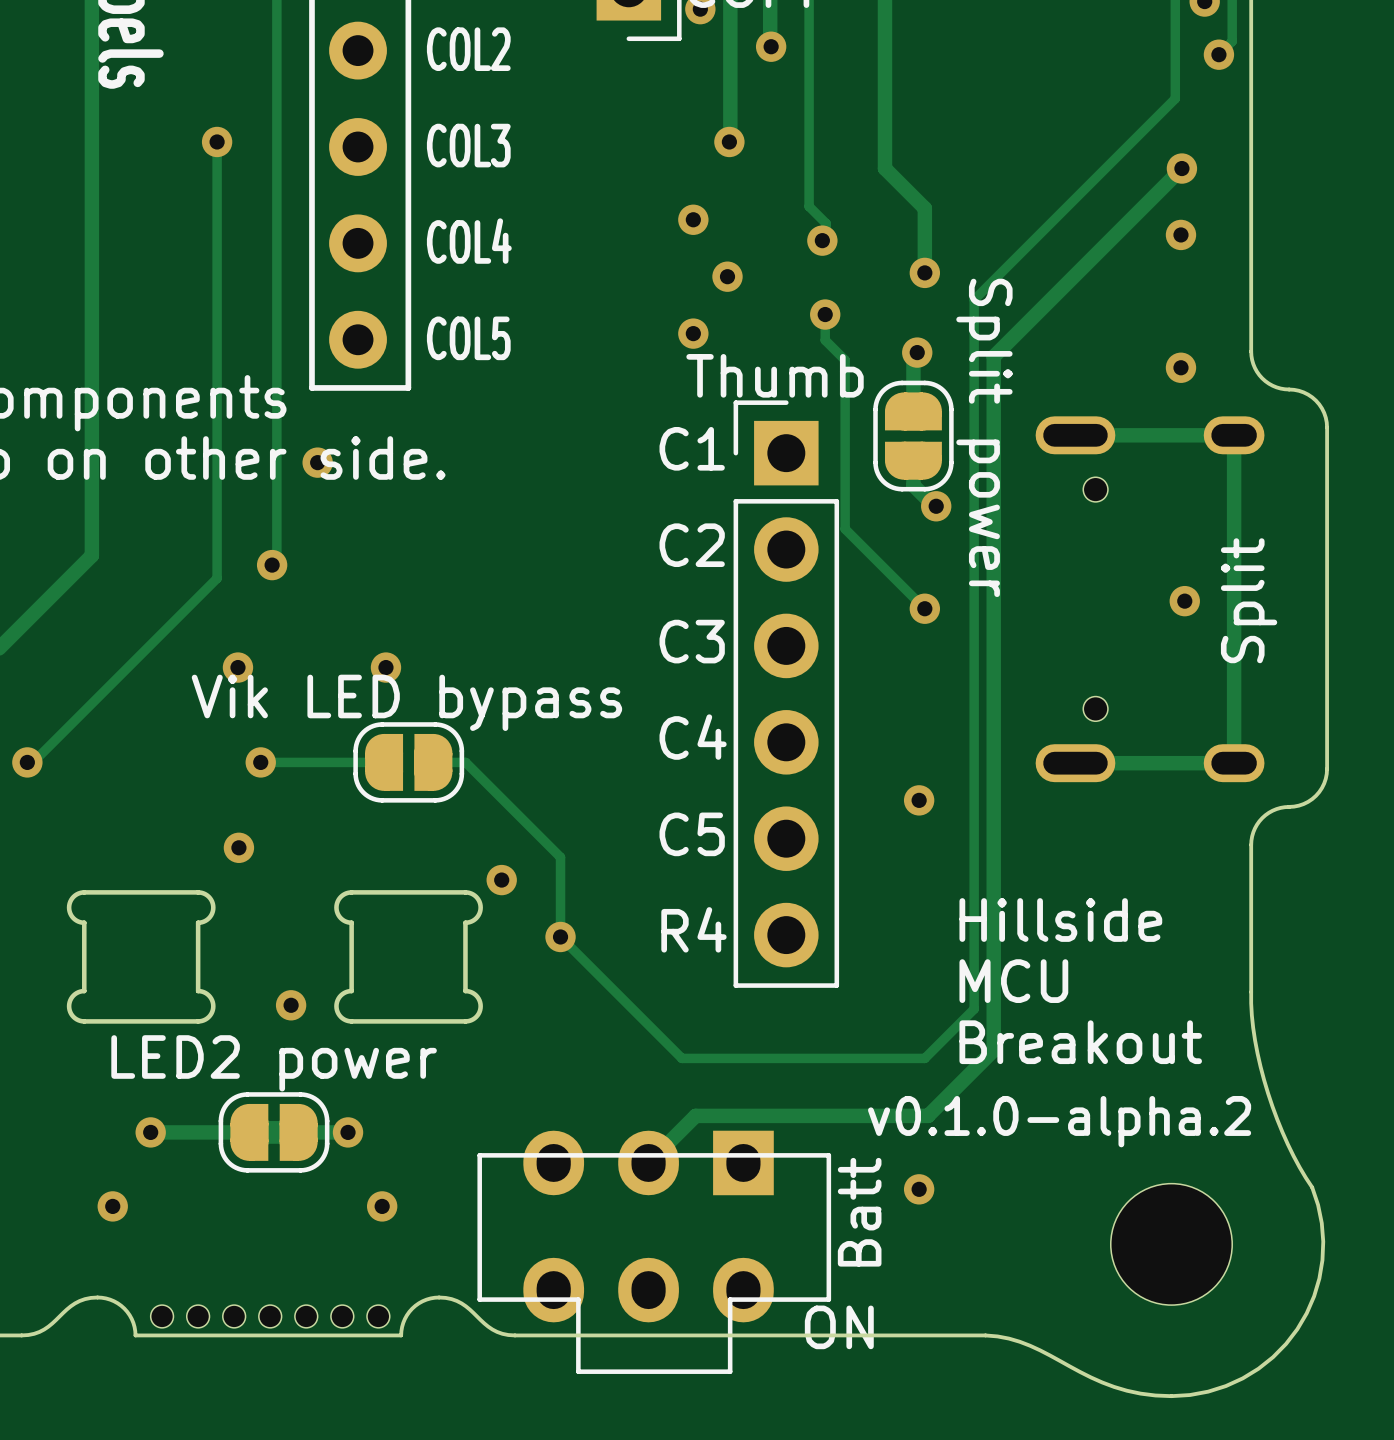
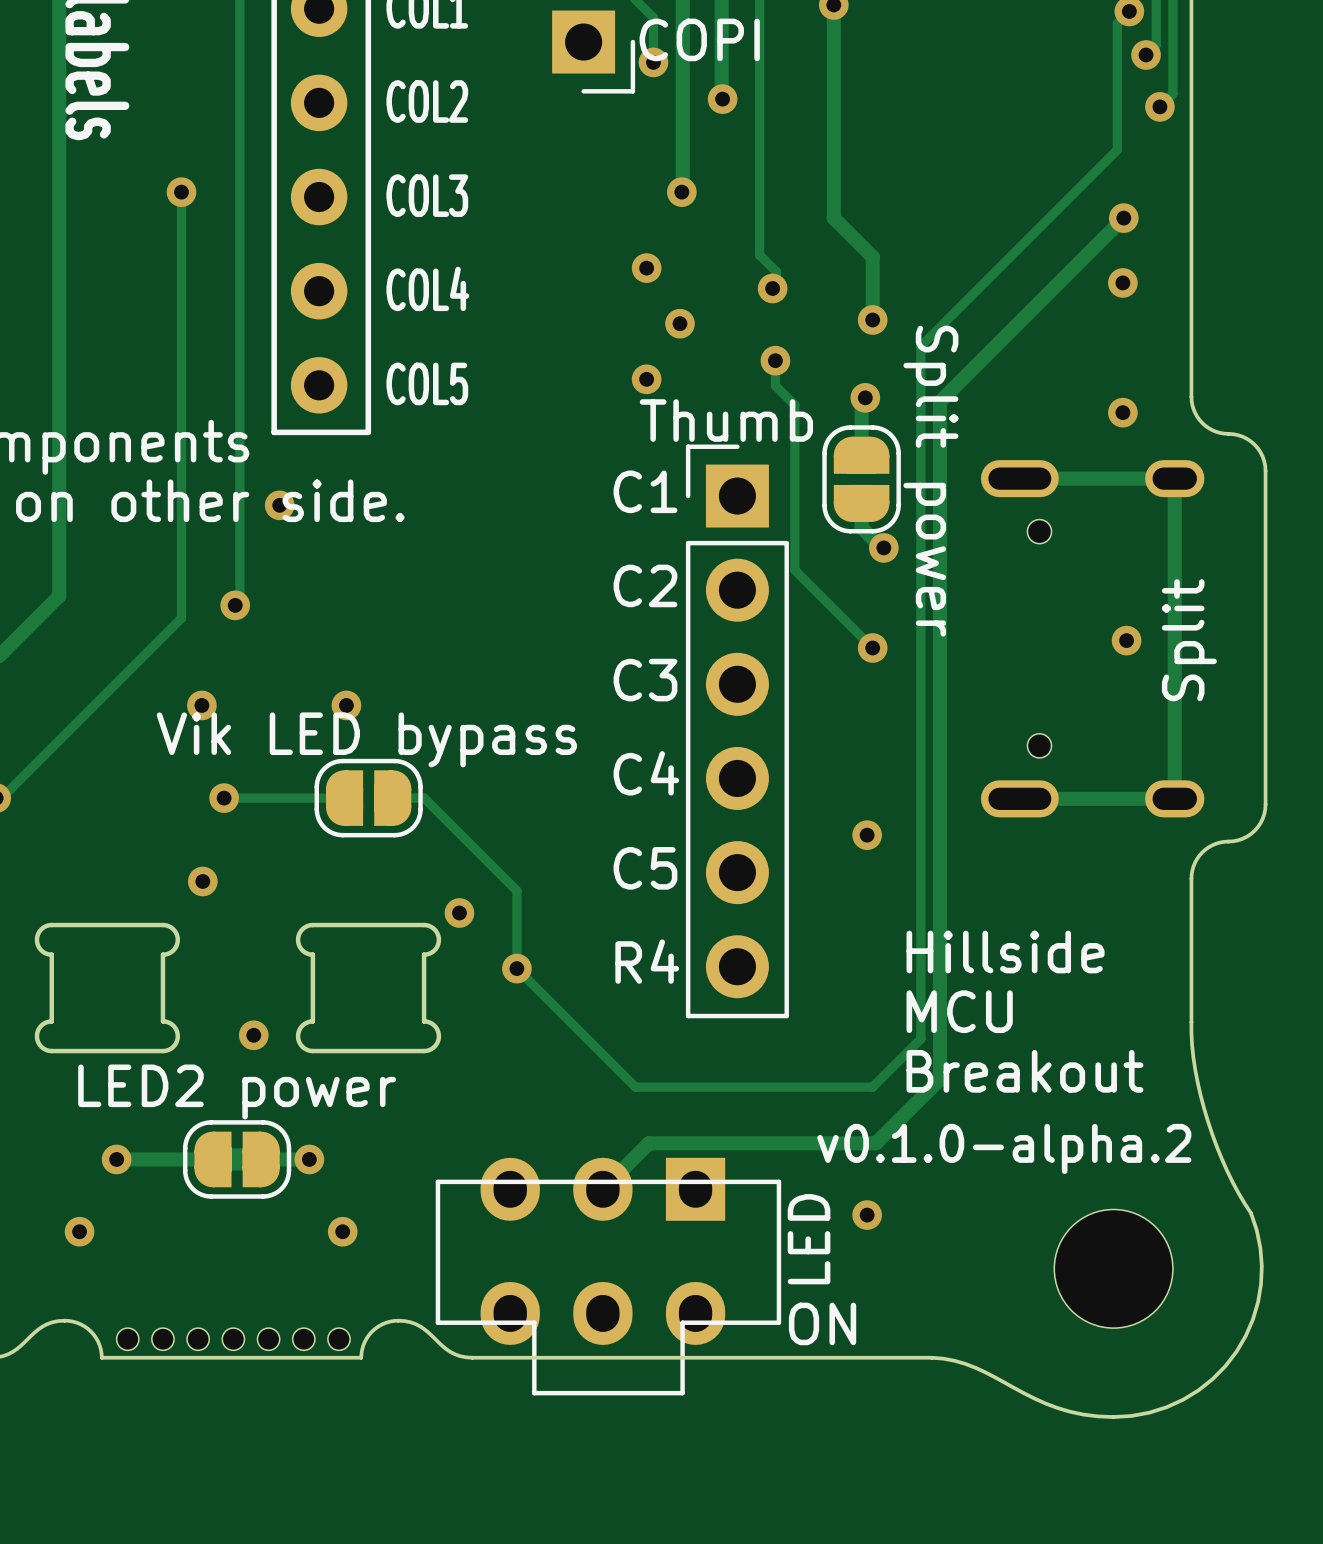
part text: Batt (859, 1212) -> LED (809, 1239)
part text position: ON (839, 1327) -> ON (822, 1323)

